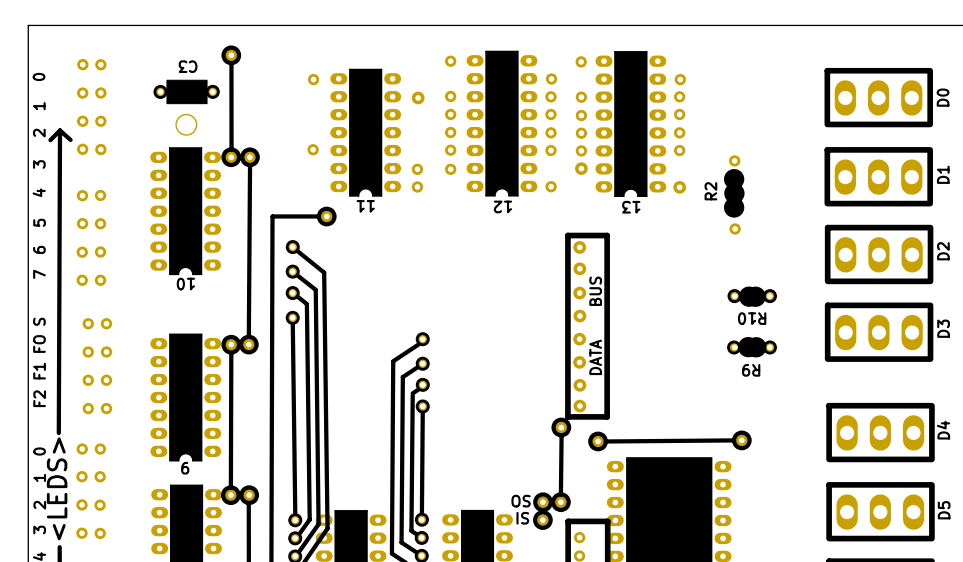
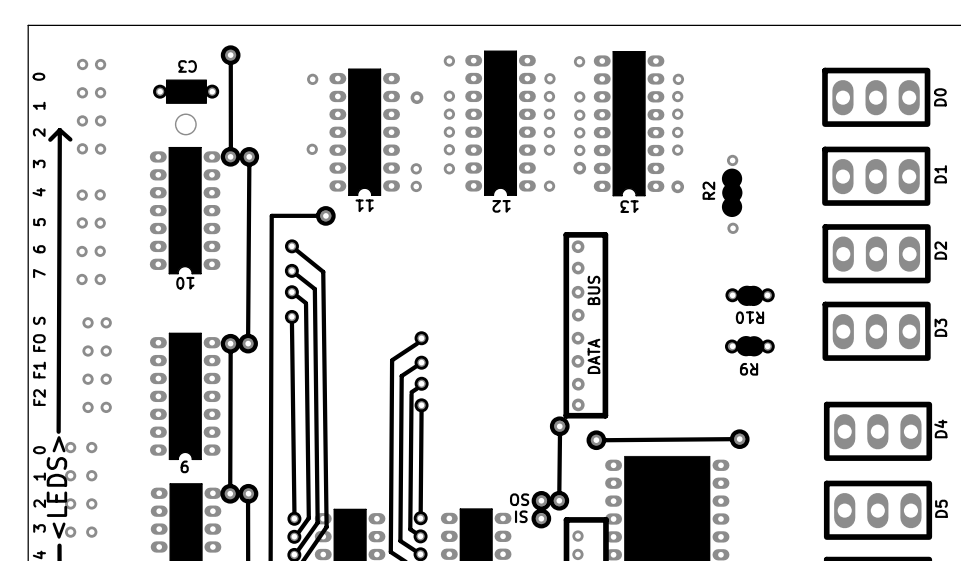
part: none -> (70, 447)
part: none -> (91, 447)
part: (82, 449) -> none
part: (100, 449) -> none
part: (81, 476) -> none
part: (100, 476) -> none
part: none -> (70, 475)
part: none -> (91, 475)
part: (81, 504) -> none
part: none -> (70, 503)
part: none -> (91, 503)
part: (100, 505) -> none
part: none -> (70, 532)
part: (81, 533) -> none
part: none -> (91, 532)
part: (100, 533) -> none

